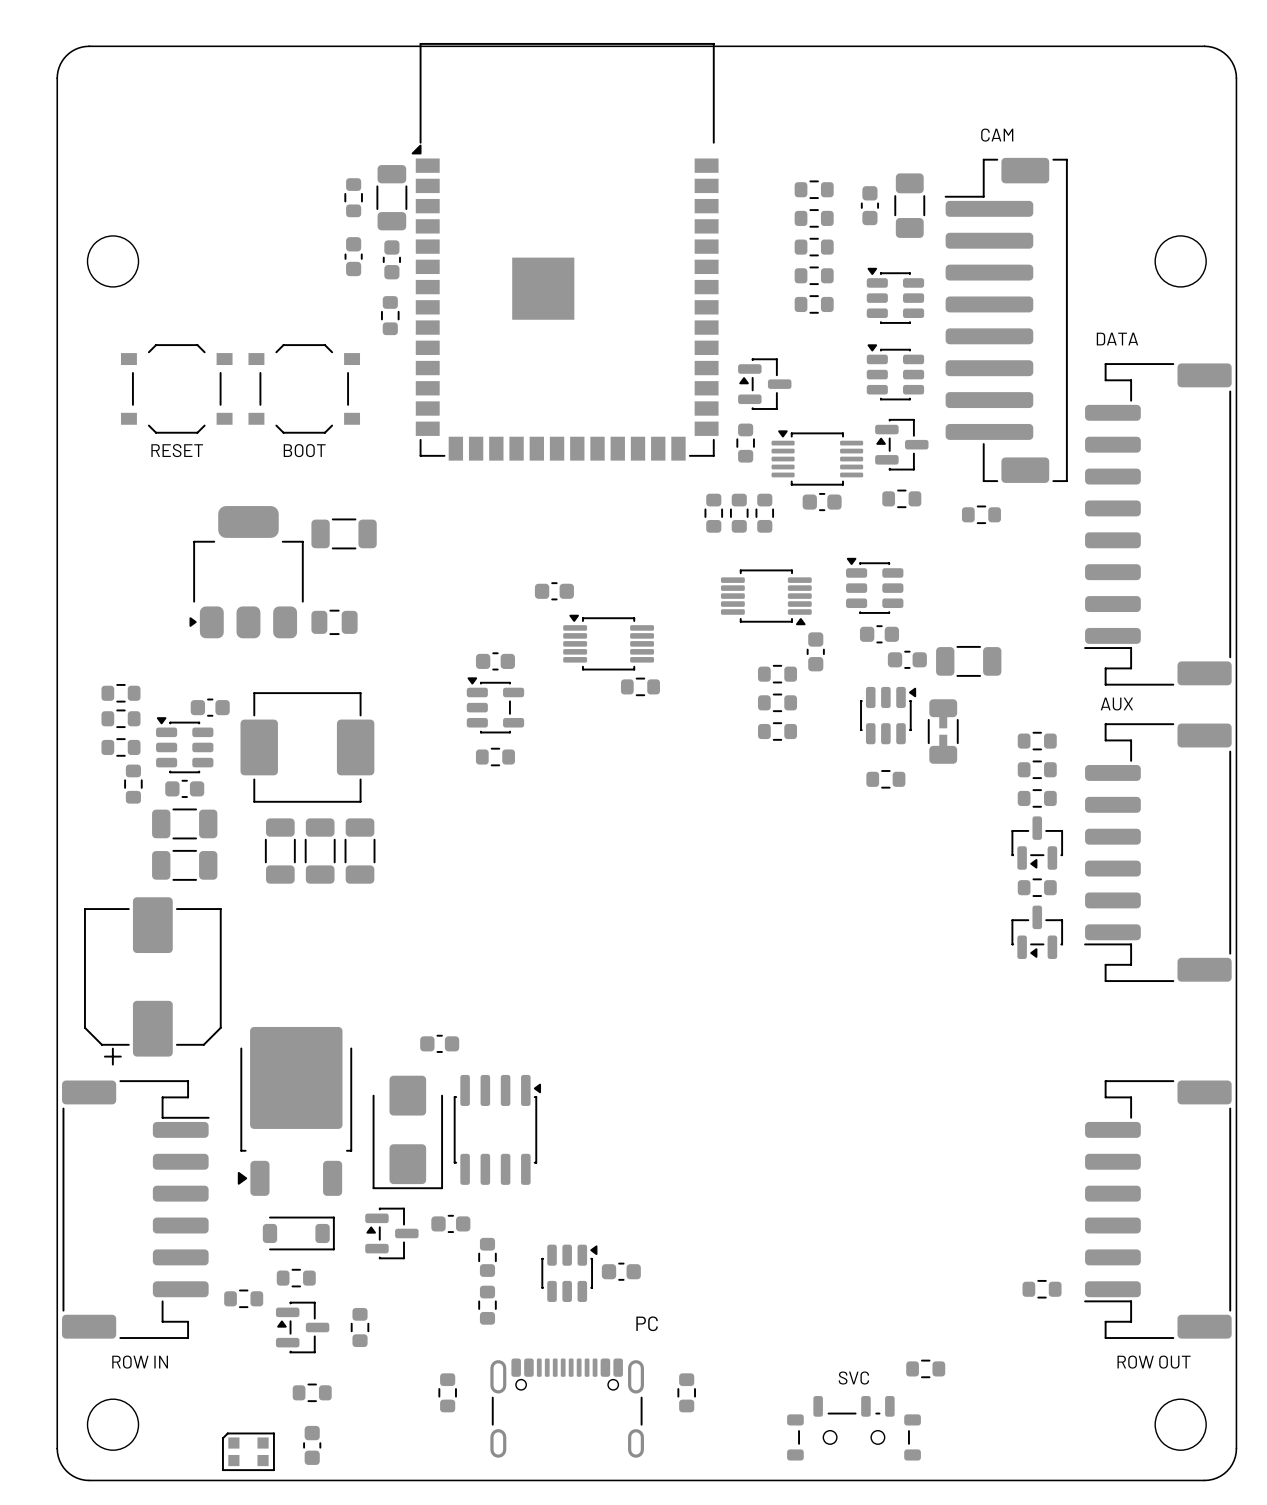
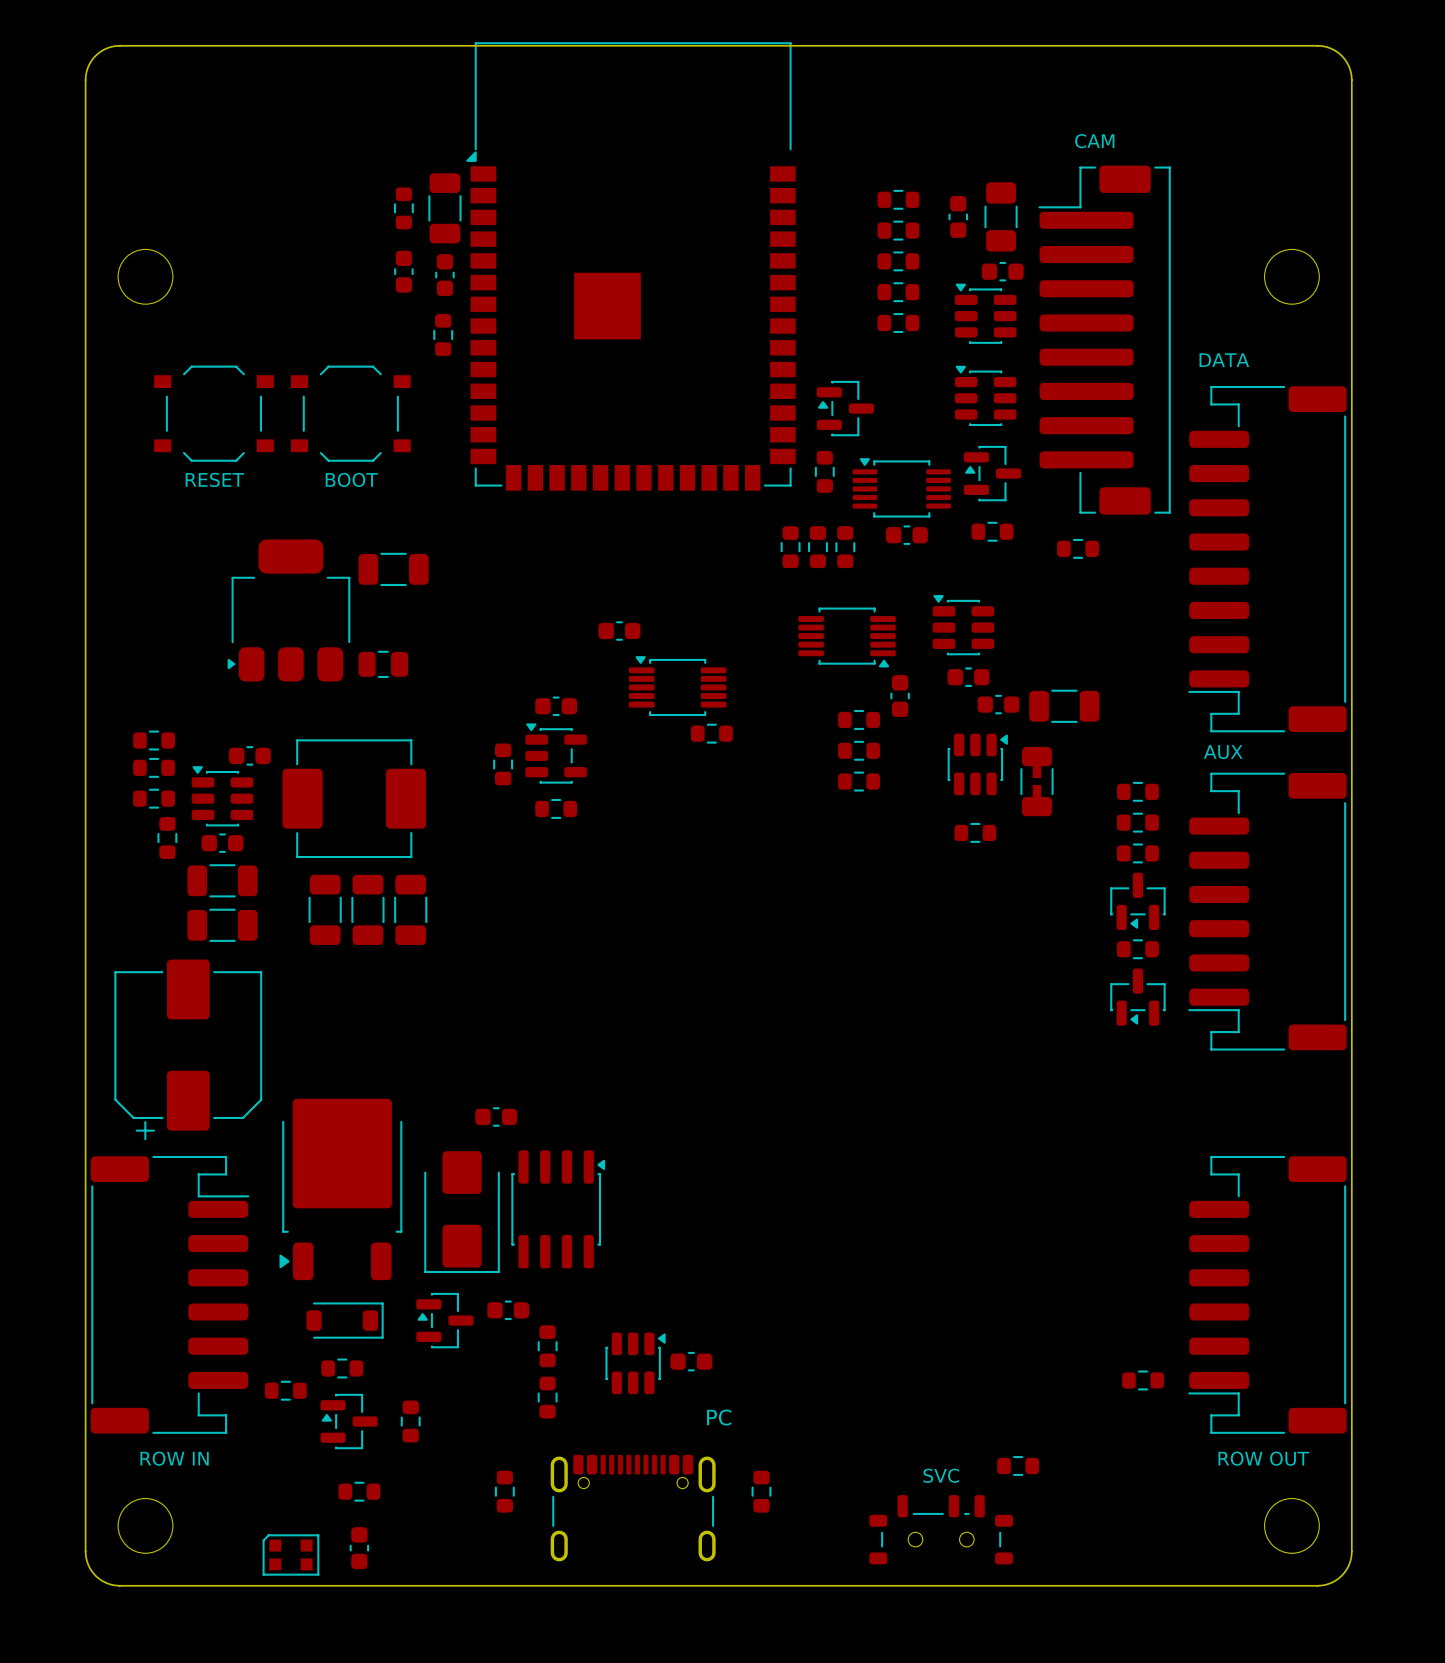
part: none -> (1002, 271)
part: none -> (503, 764)

